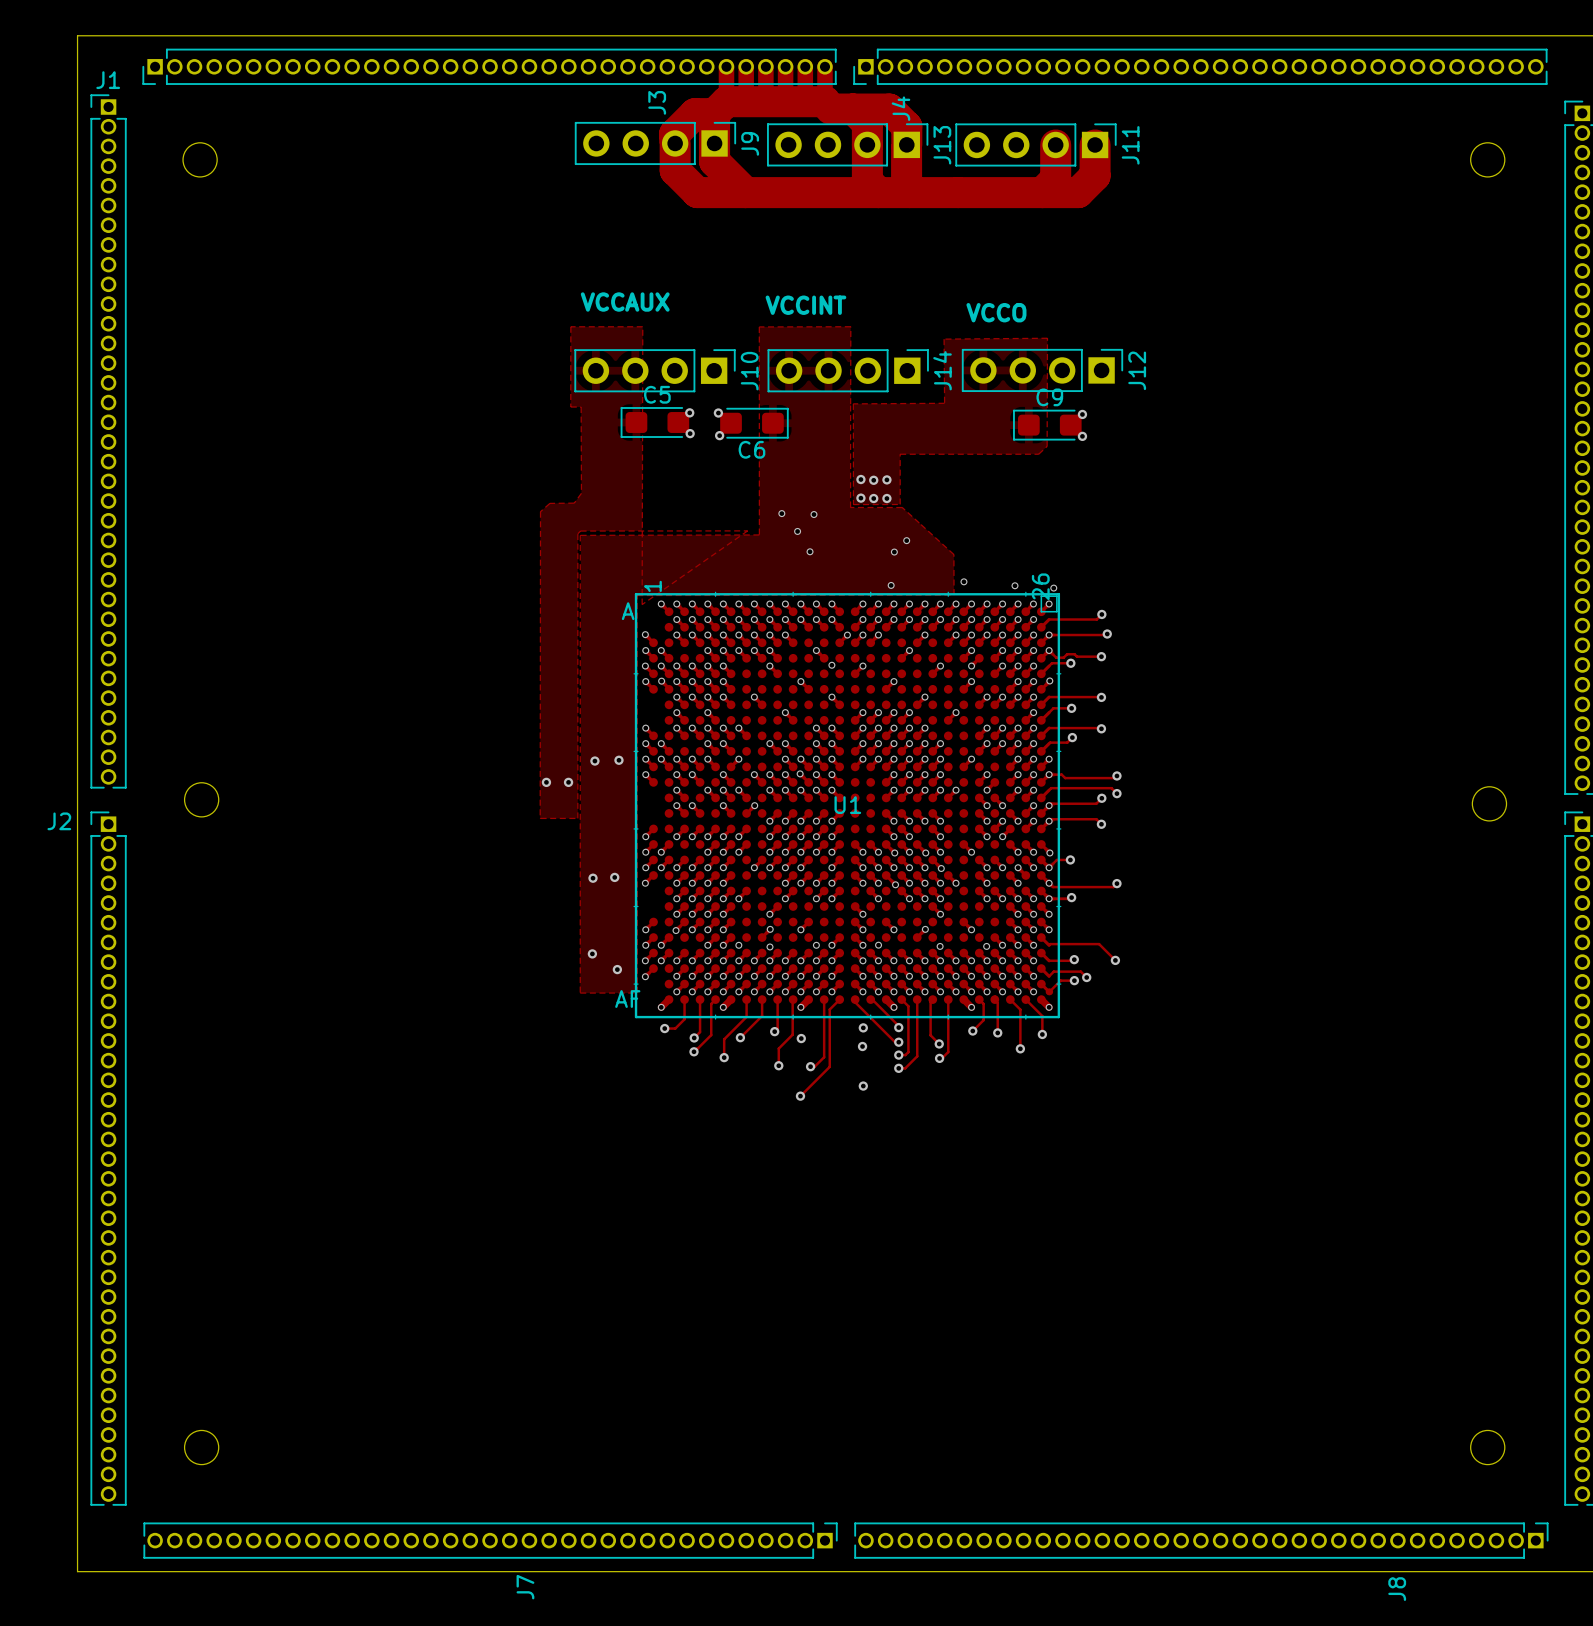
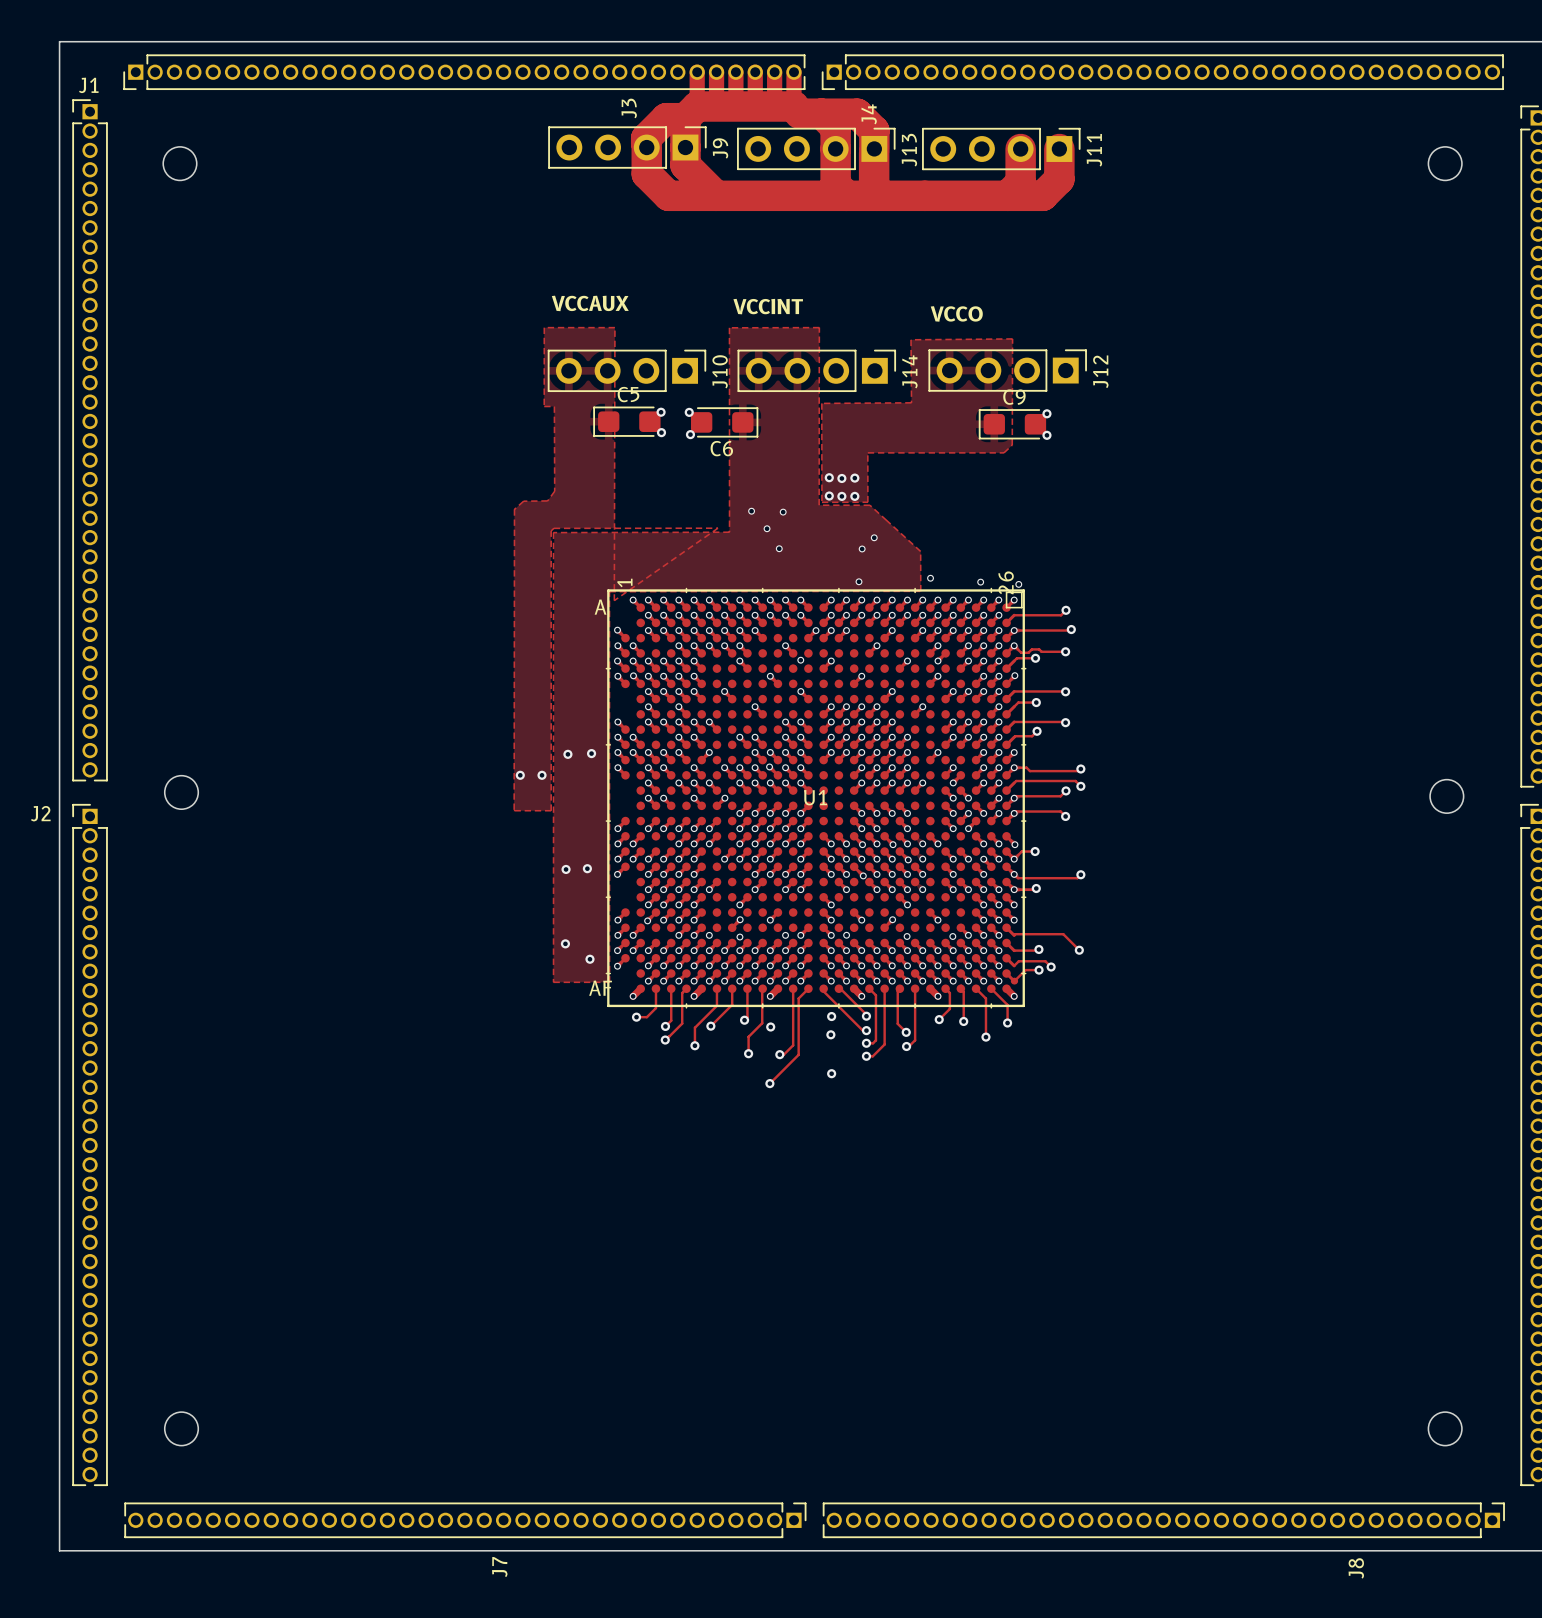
via: none -> (922, 843)
via: none -> (922, 859)
via: none -> (922, 889)

